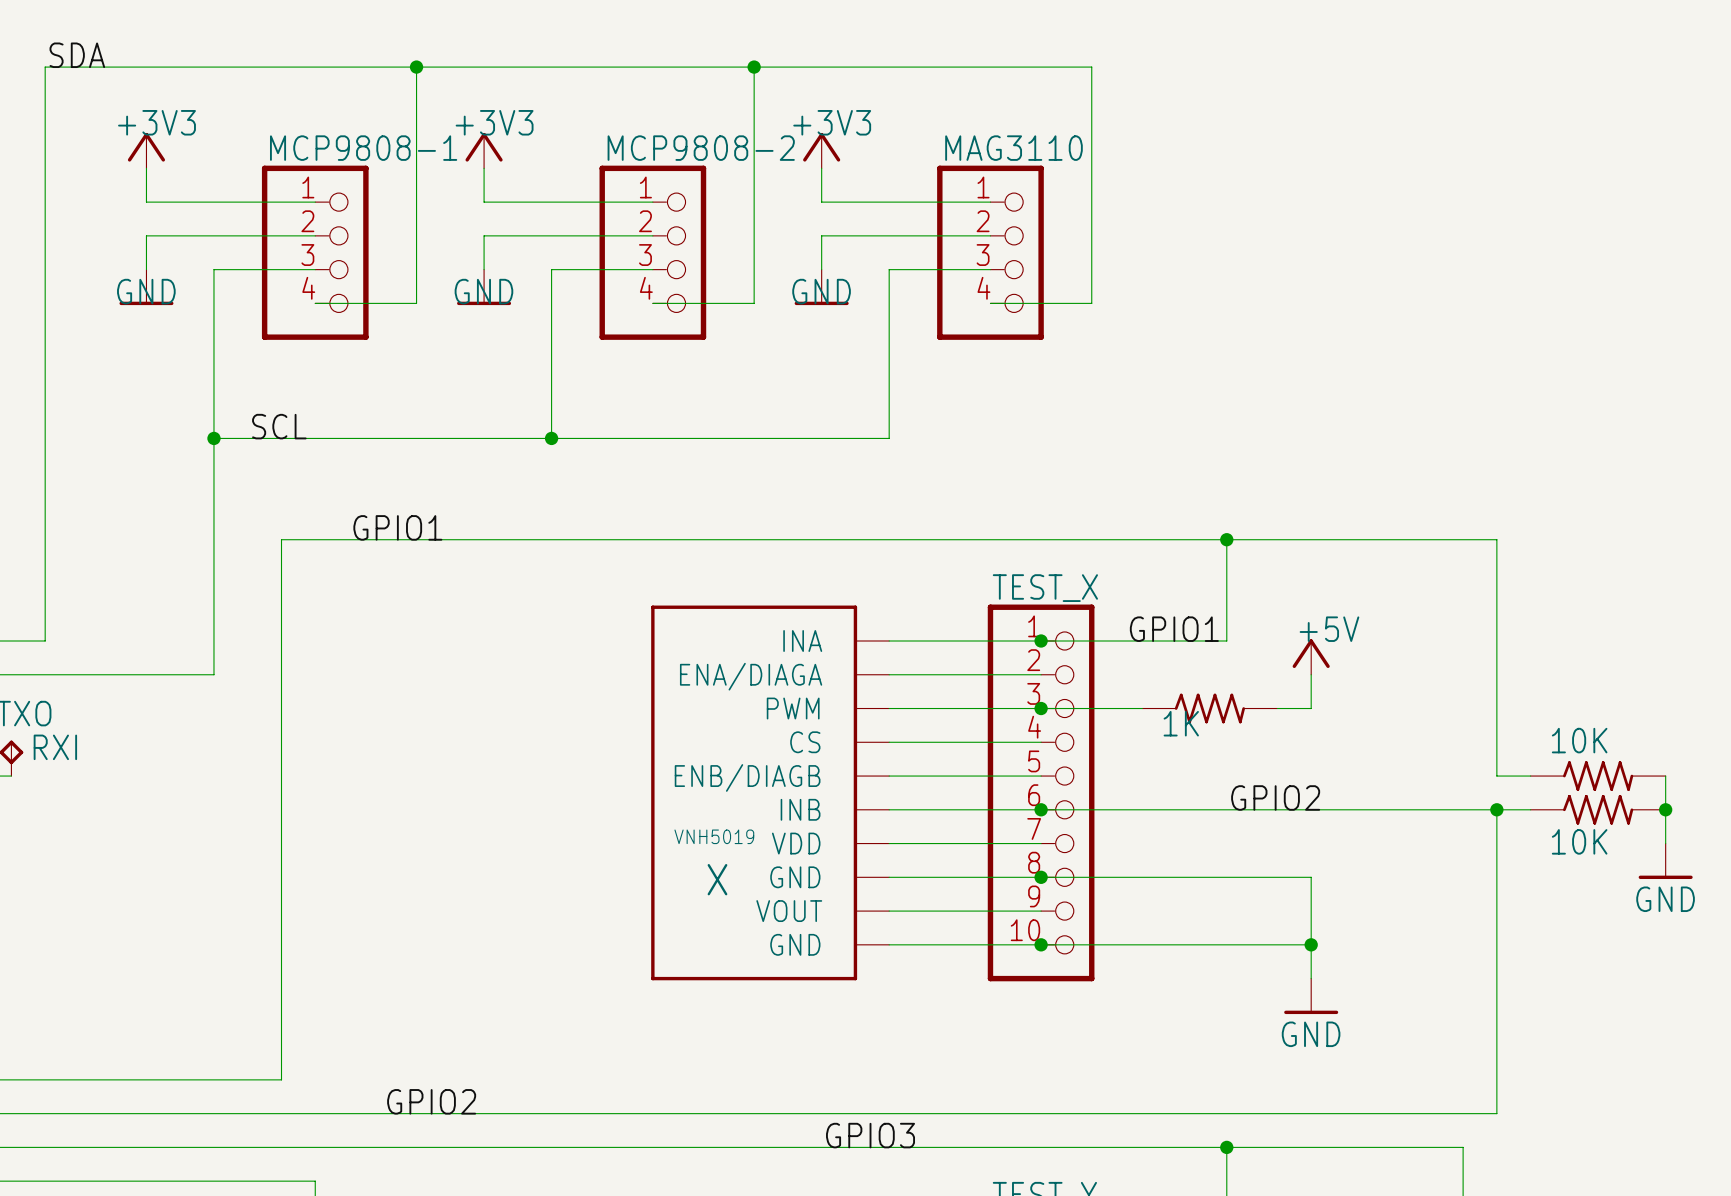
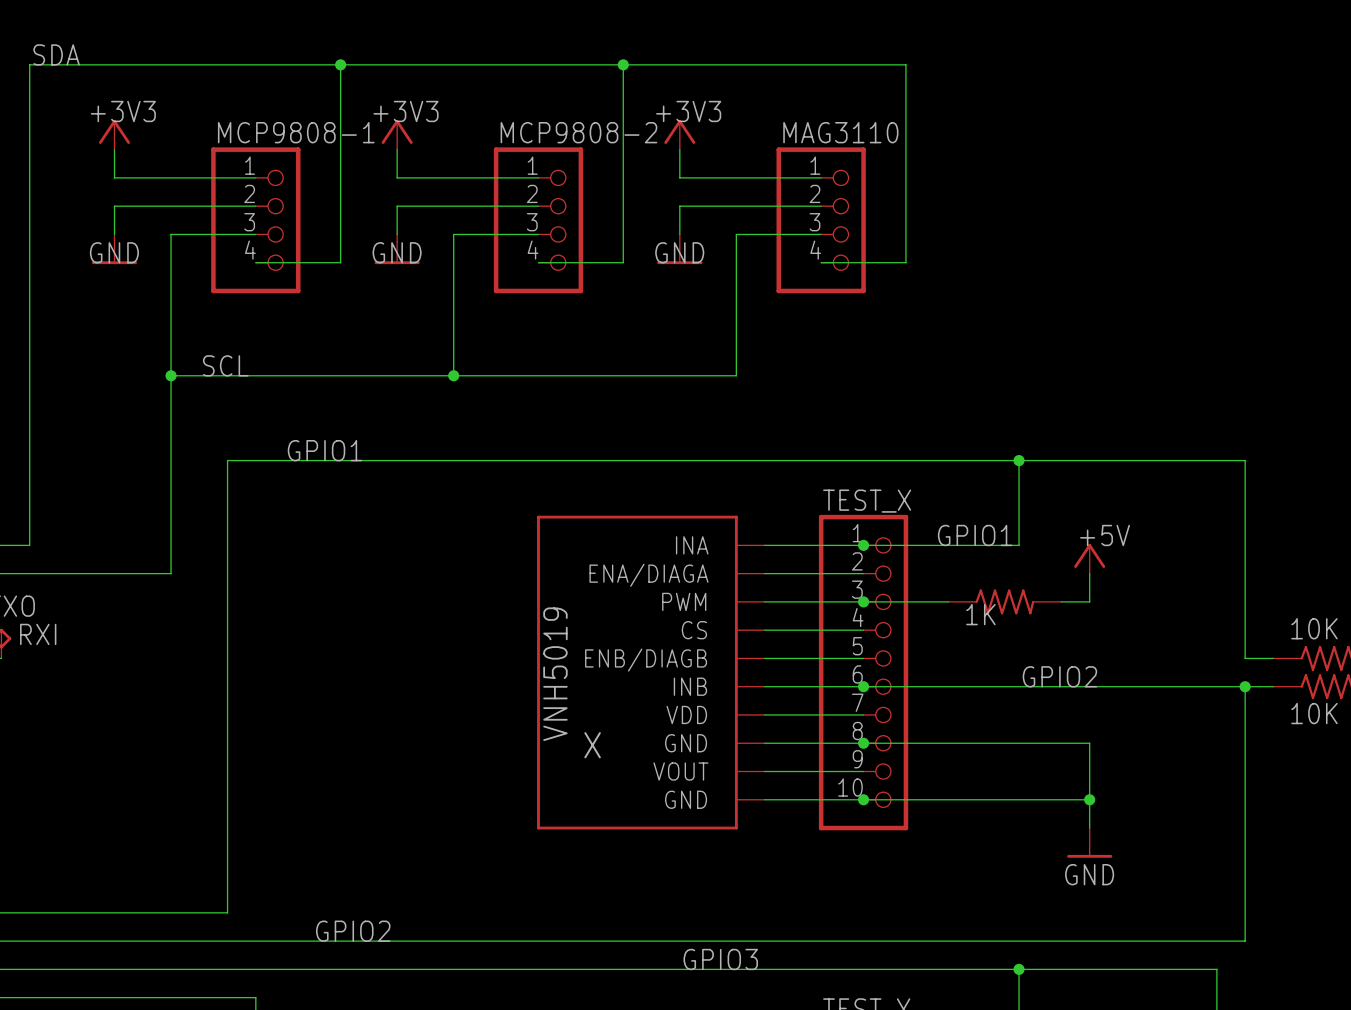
part: (770, 792) -> none
part: none -> (650, 672)

